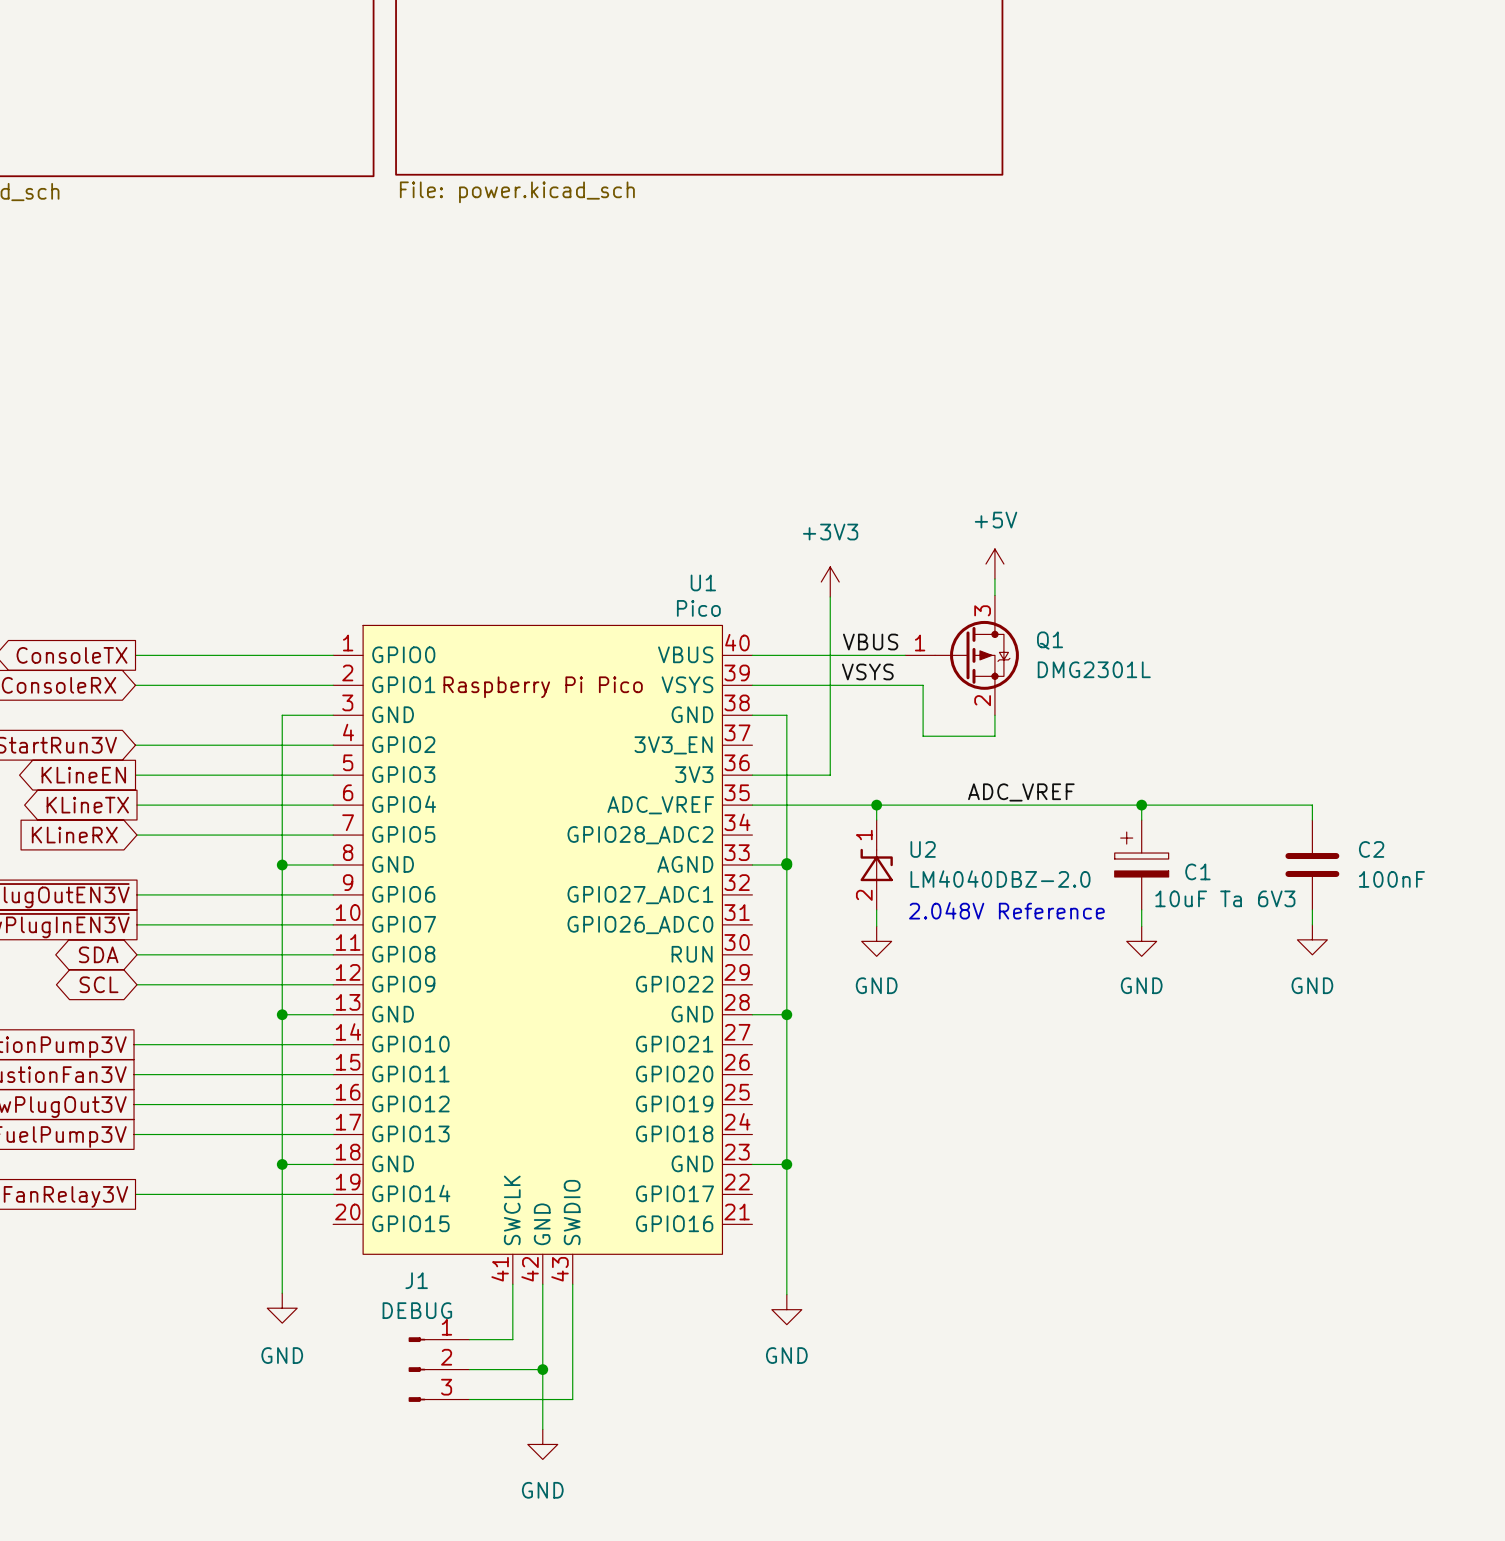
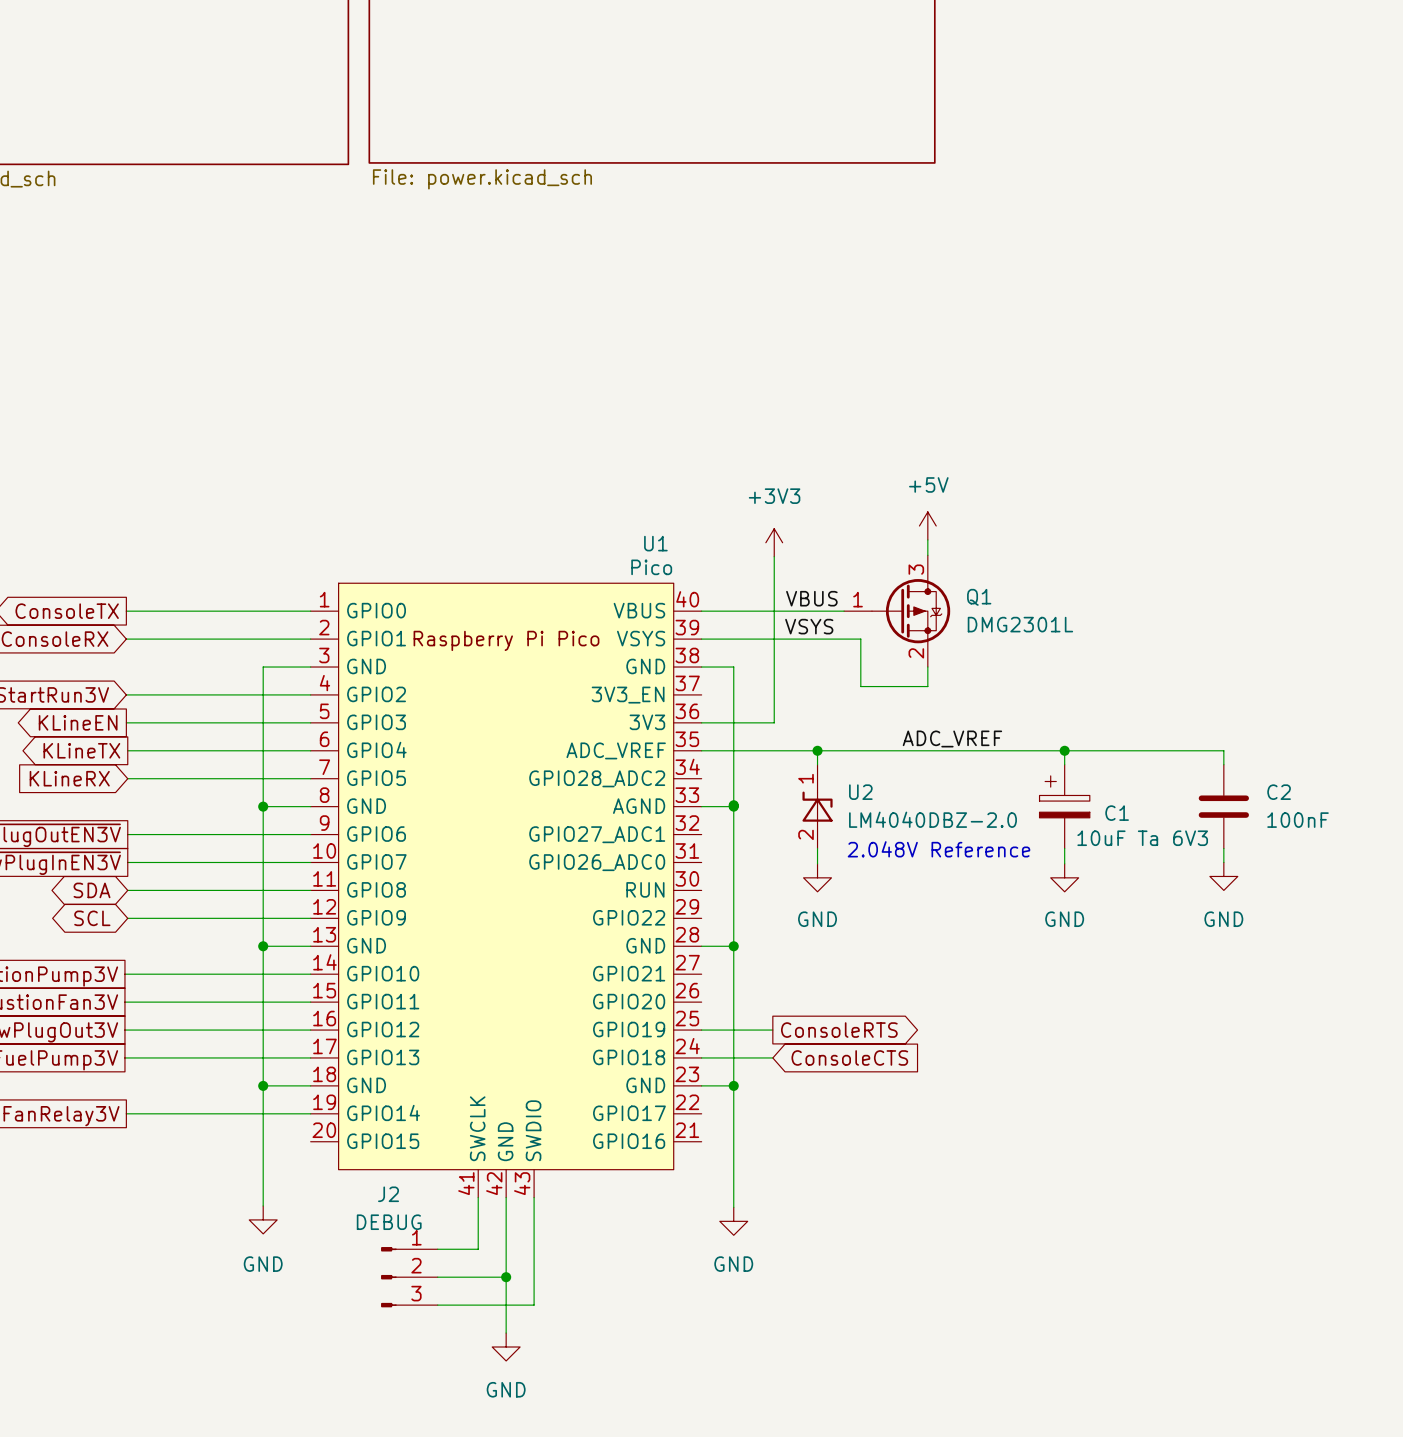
wire: none -> (701, 1030) (772, 1030)
global label: none -> ConsoleRTS (839, 1030)
wire: none -> (701, 1057) (772, 1057)
global label: none -> ConsoleCTS (849, 1057)
J1 name: J1 (416, 1280) -> J2 (388, 1194)

